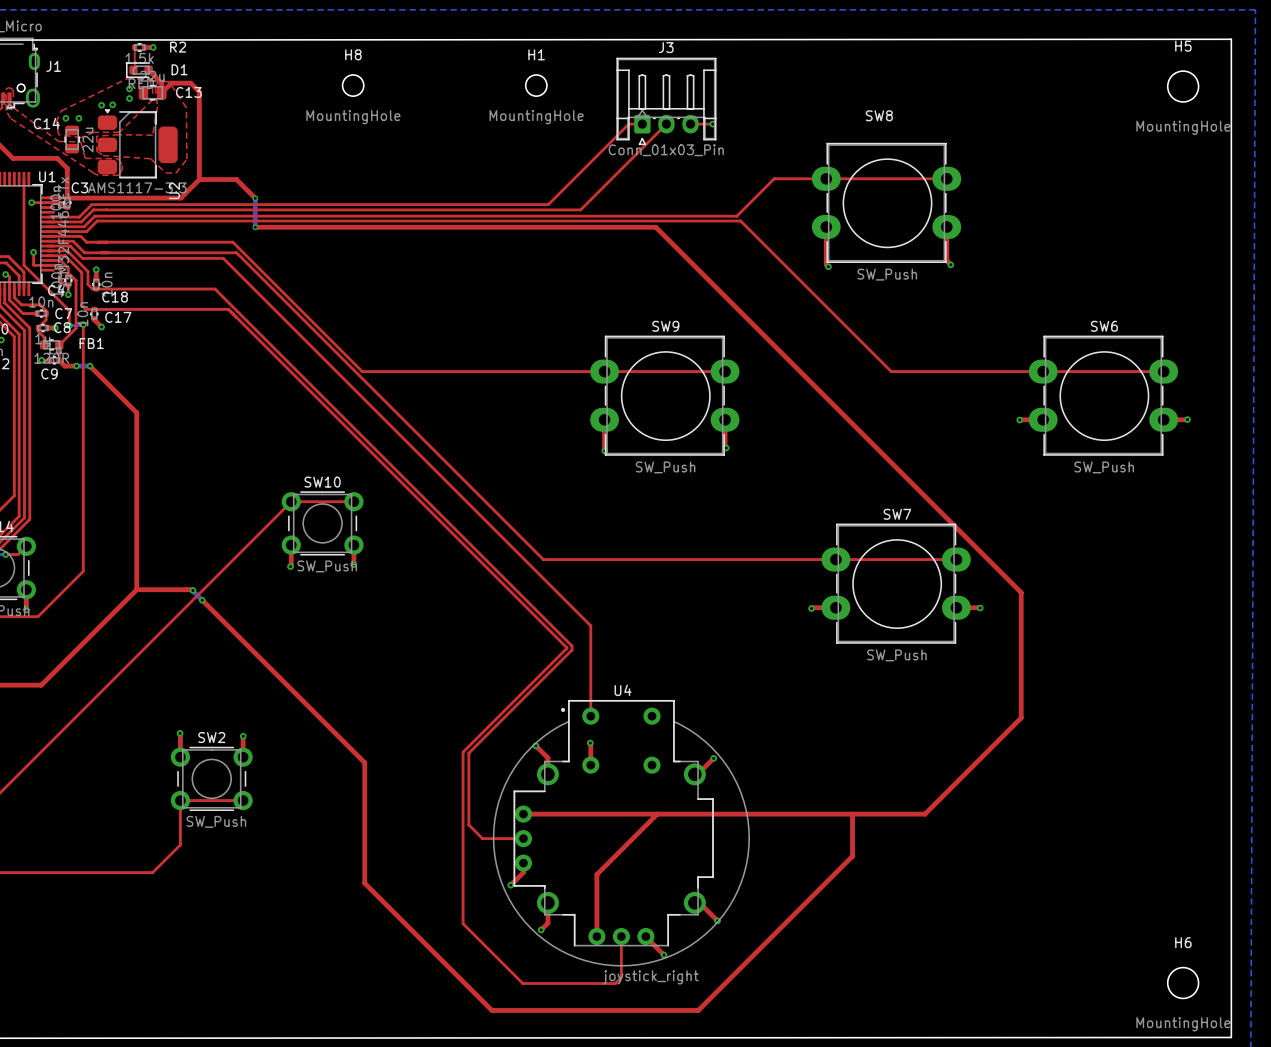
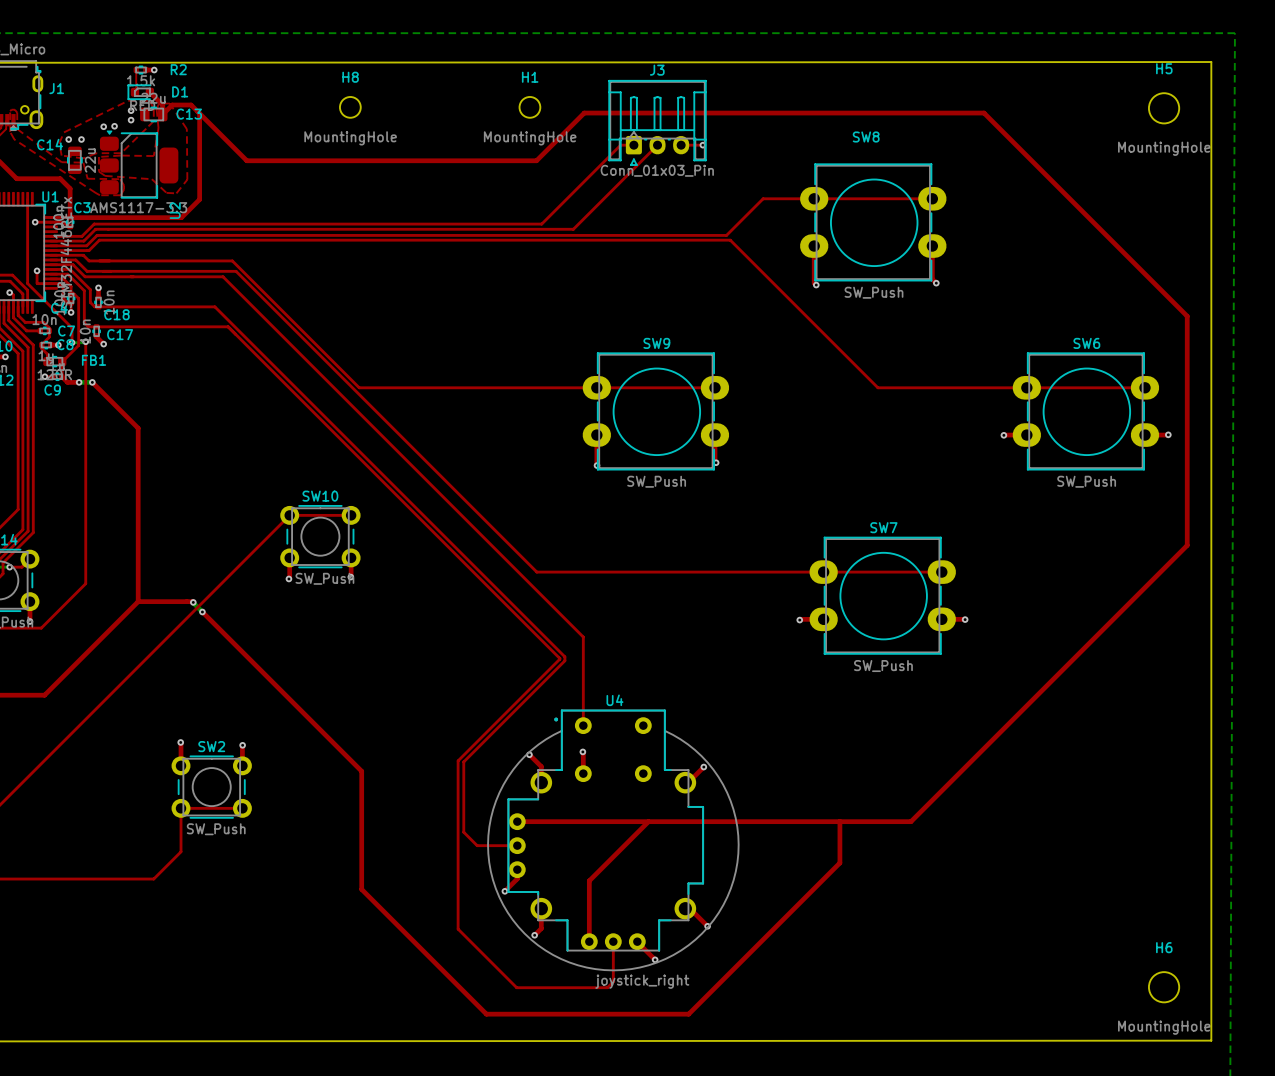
top track: (199, 179) (236, 179) (255, 198) -> none
bottom track: (255, 198) (255, 227) -> none
via: (255, 198) -> none
top track: (255, 227) (655, 227) (1021, 592) (1021, 717) -> (199, 113) (246, 160) (536, 160) (584, 113) (984, 113) (1187, 316) (1187, 545) (1005, 727)
via: (255, 227) -> none

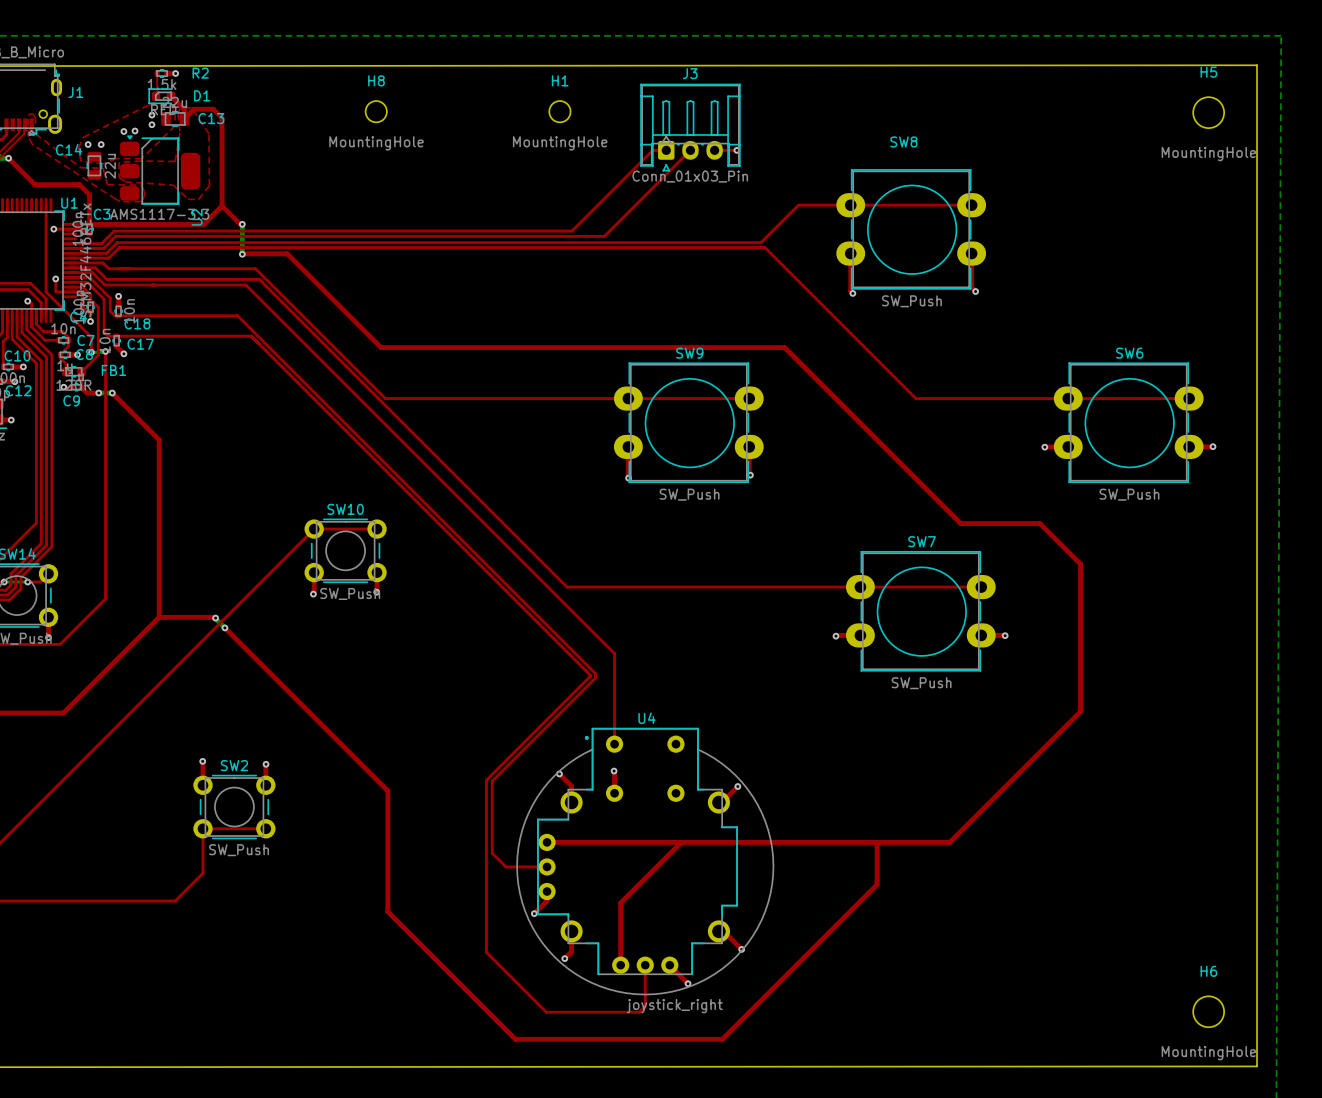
top track: (199, 113) (246, 160) (536, 160) (584, 113) (984, 113) (1187, 316) (1187, 545) (1038, 693) -> (242, 254) (287, 253) (381, 347) (784, 347) (960, 523) (1039, 523) (1080, 564) (1080, 711)
top track: none -> (222, 205) (242, 224)
bottom track: none -> (242, 224) (242, 253)
via: none -> (242, 224)
via: none -> (242, 254)

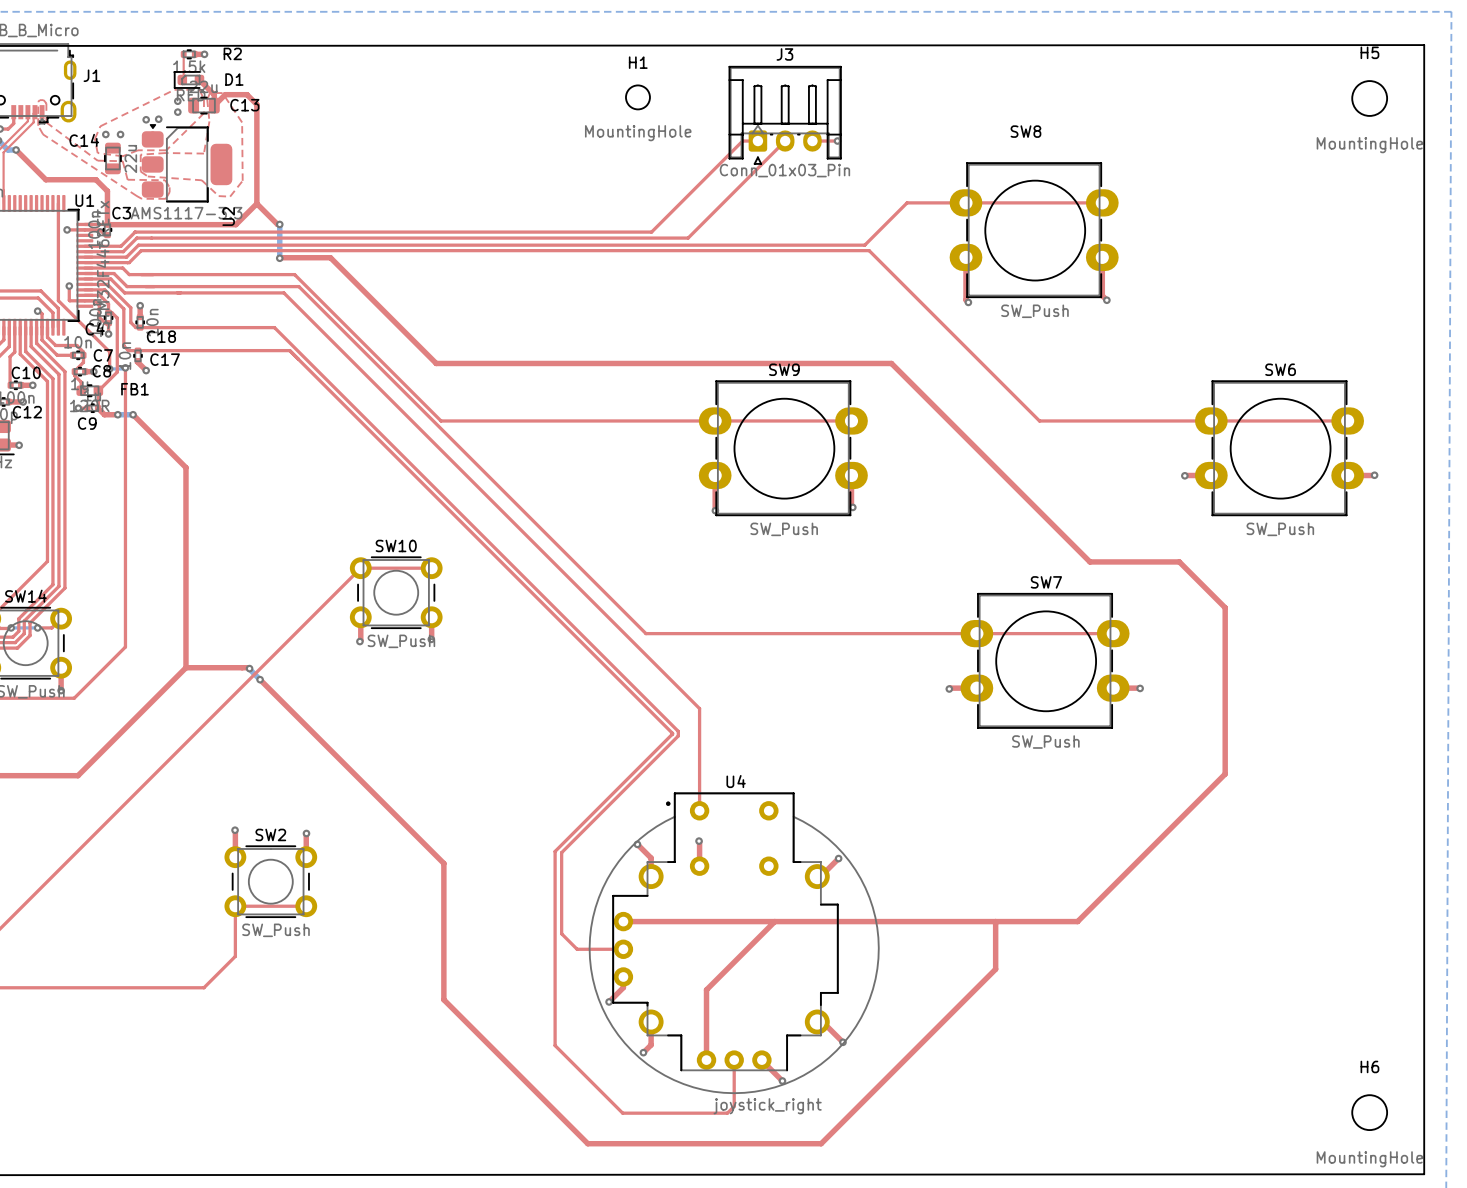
H8: MountingHole (376, 111) -> none

